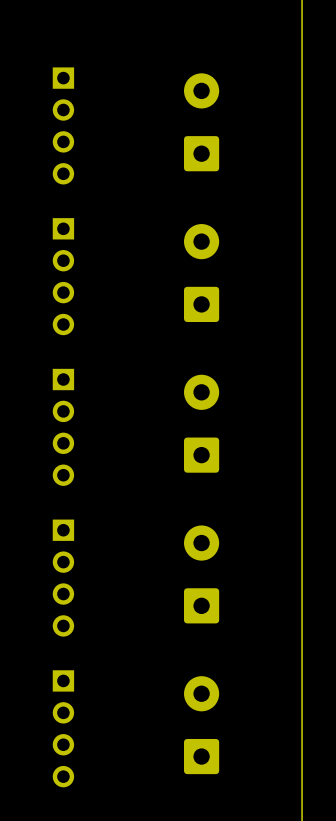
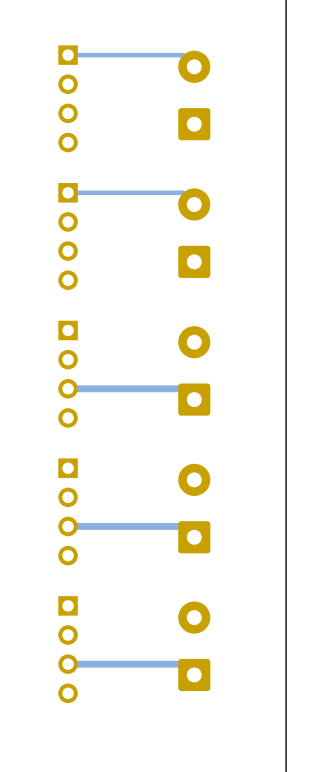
track: none -> (68, 55) (182, 55) (194, 66)
track: none -> (68, 192) (182, 192) (194, 204)
track: none -> (68, 388) (183, 388) (194, 399)
track: none -> (68, 526) (183, 526) (194, 537)
track: none -> (68, 664) (183, 664) (194, 674)

